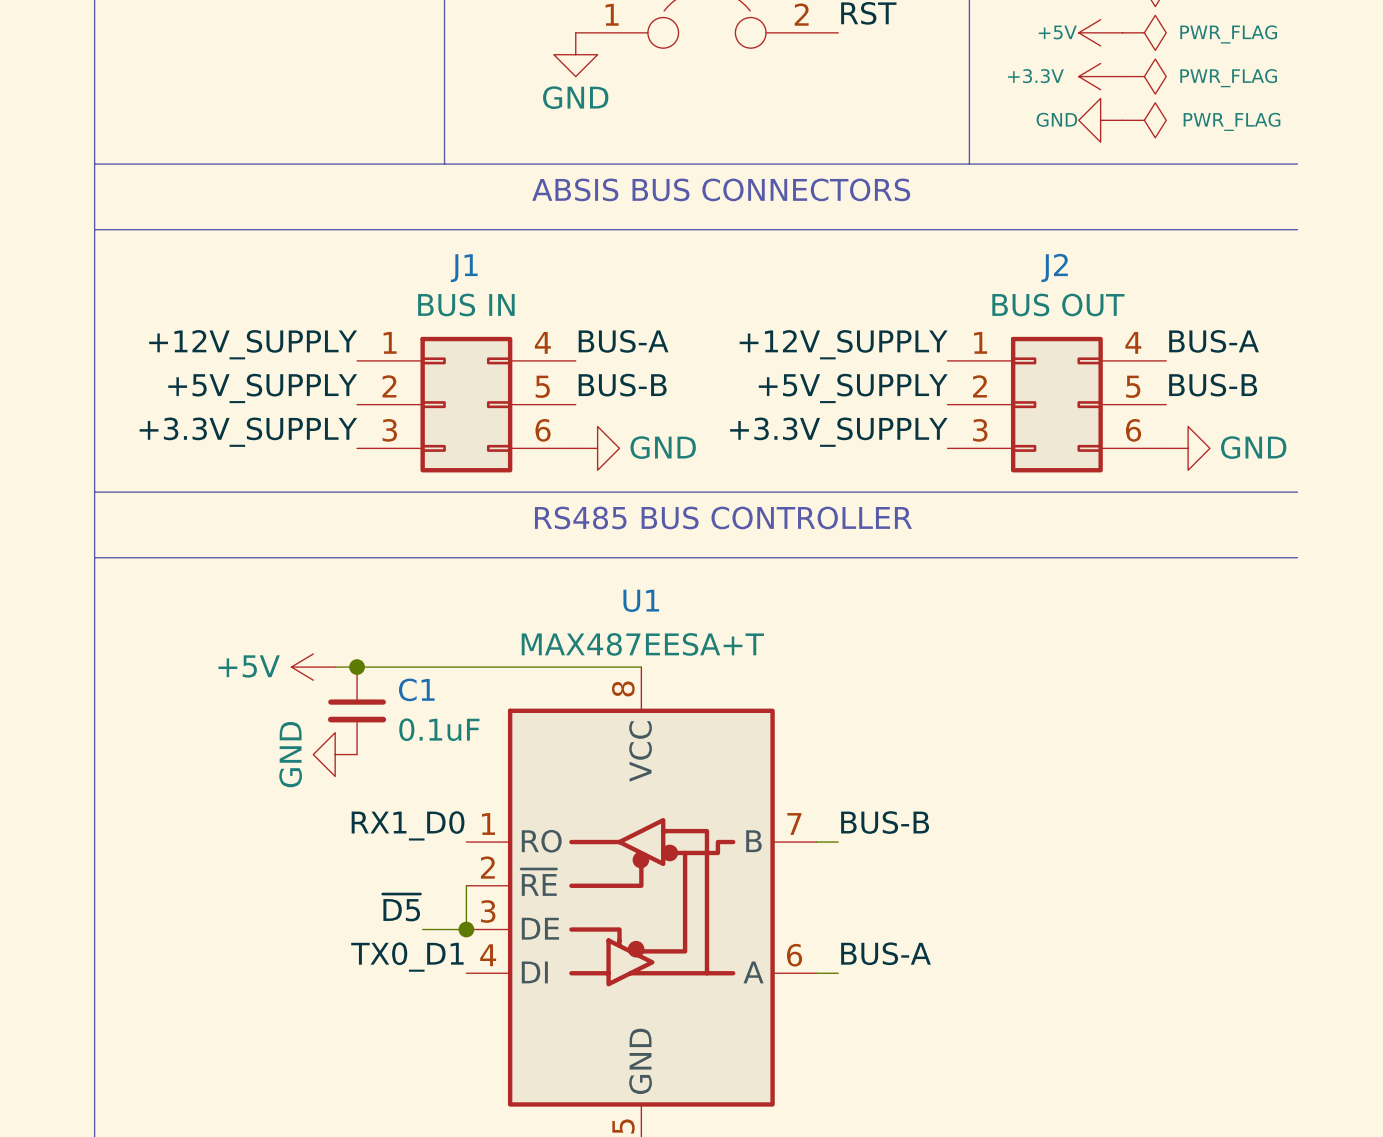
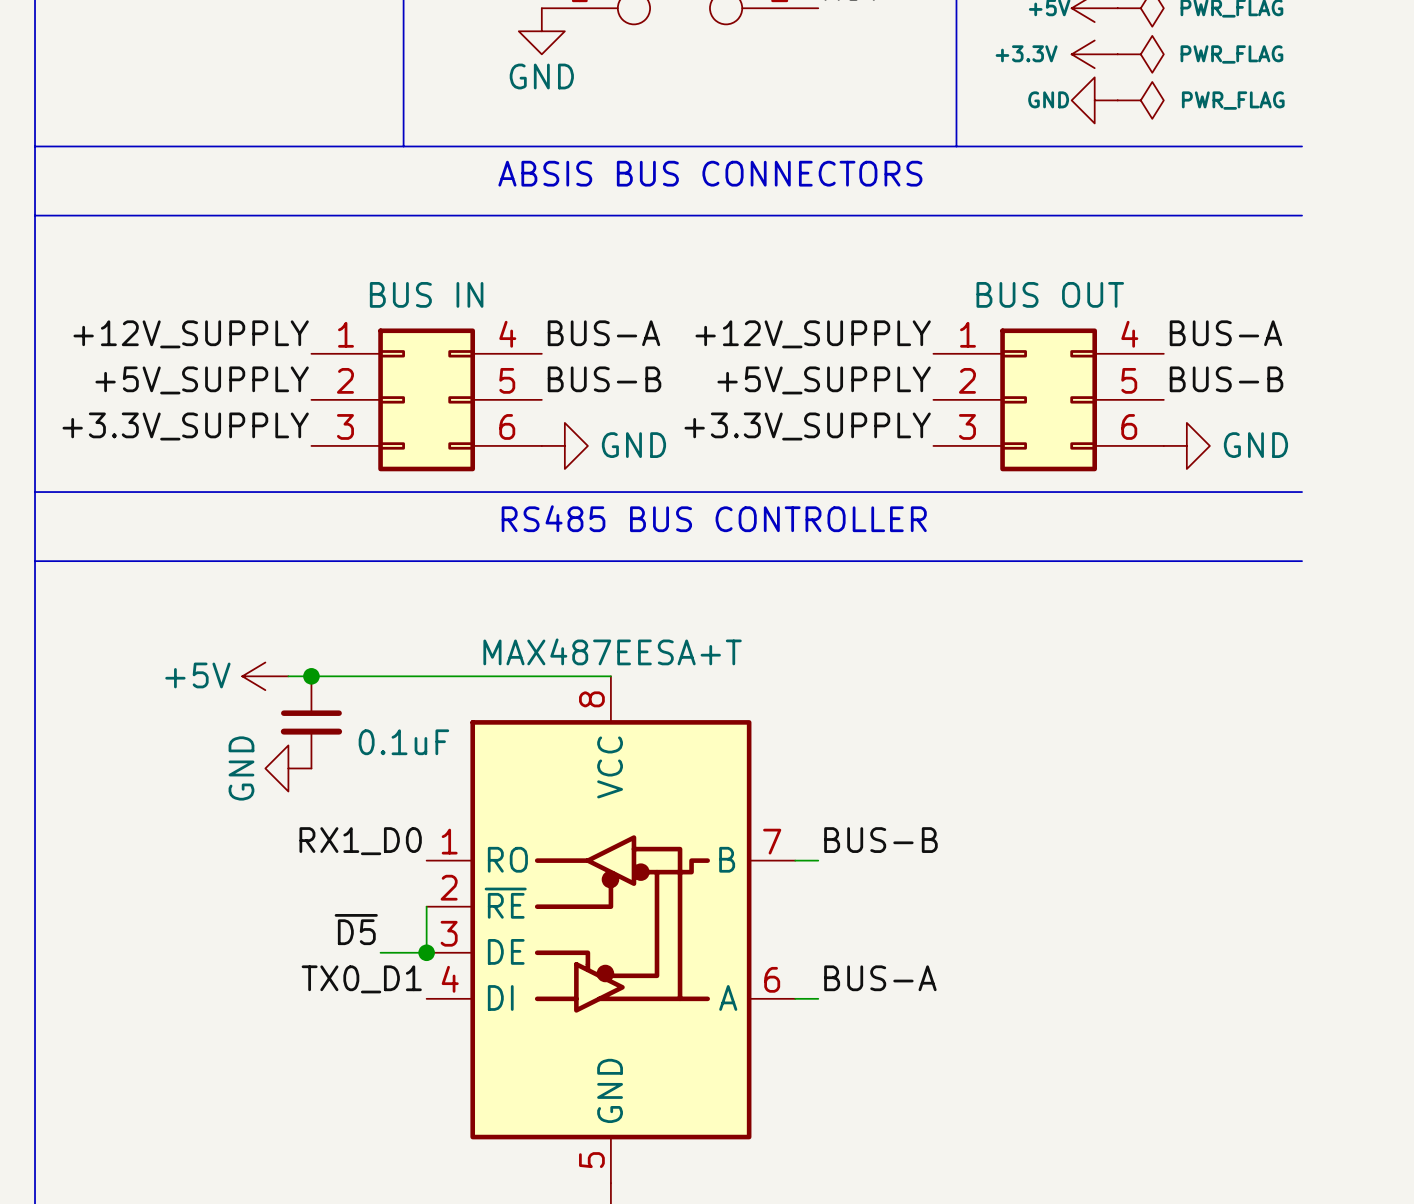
J2 name: J2 (1054, 267) -> none
J1 name: J1 (464, 268) -> none
U1 name: U1 (641, 600) -> none
C1 name: C1 (416, 689) -> none

